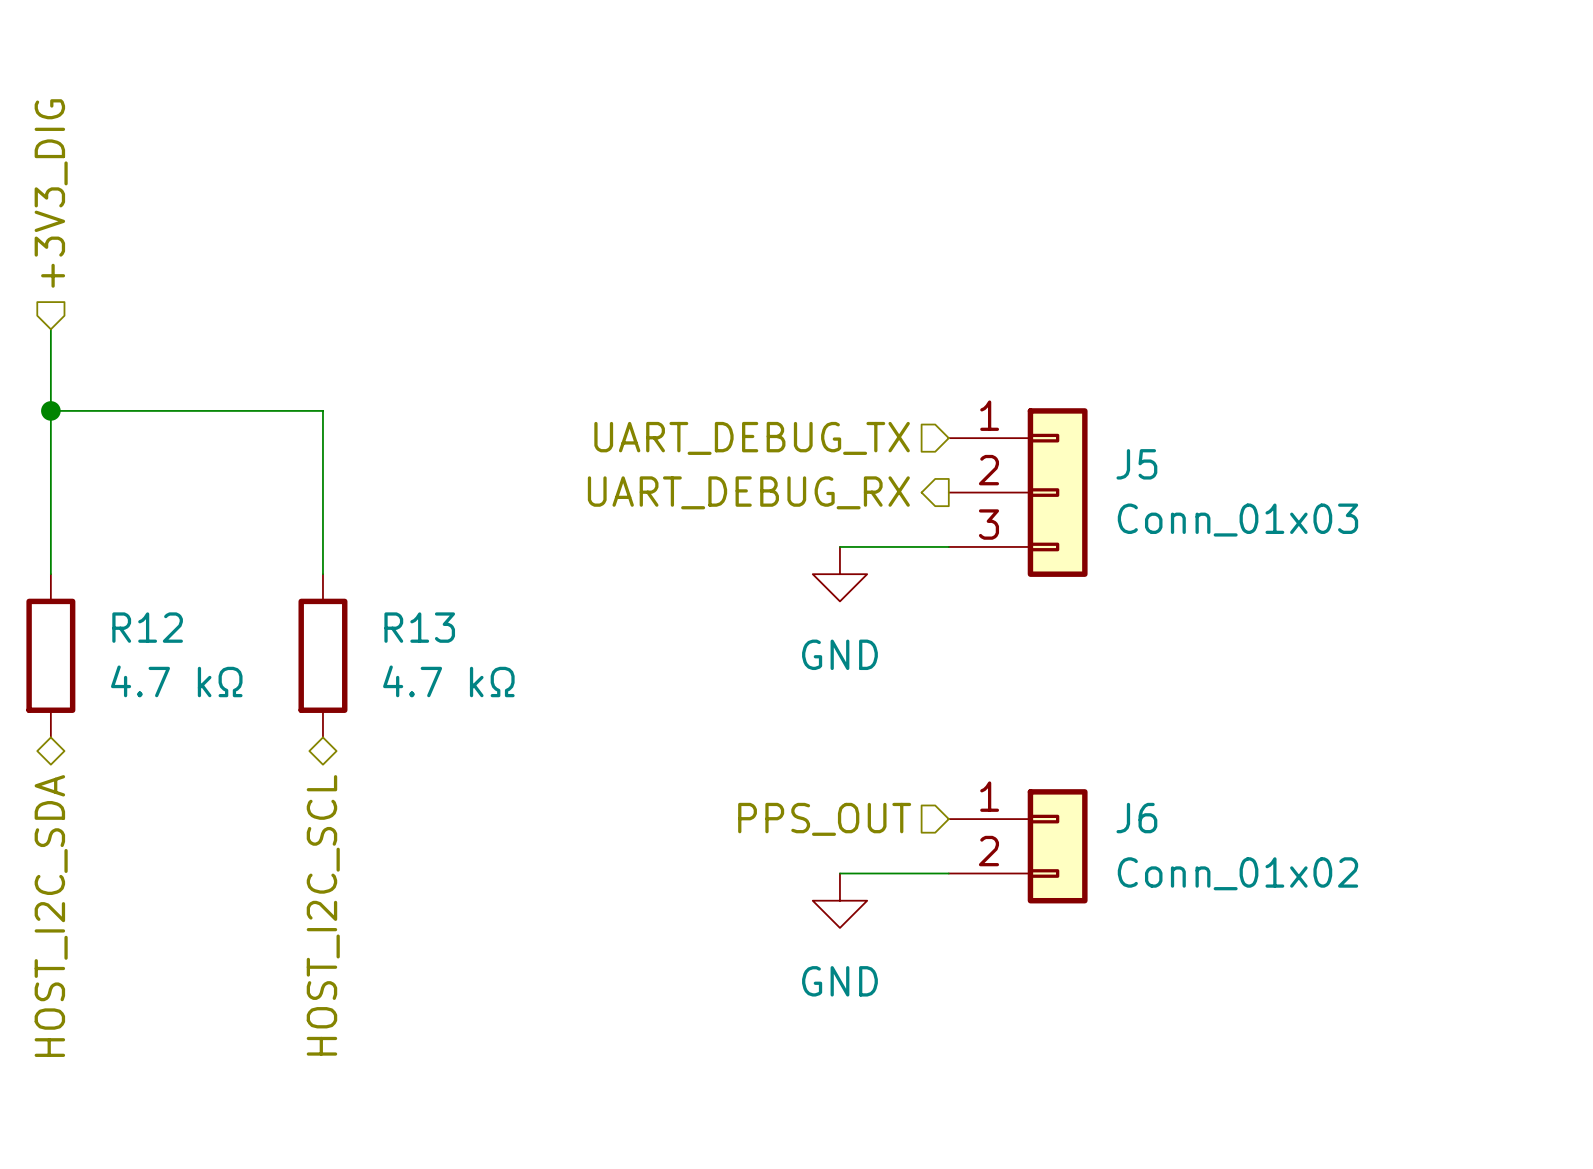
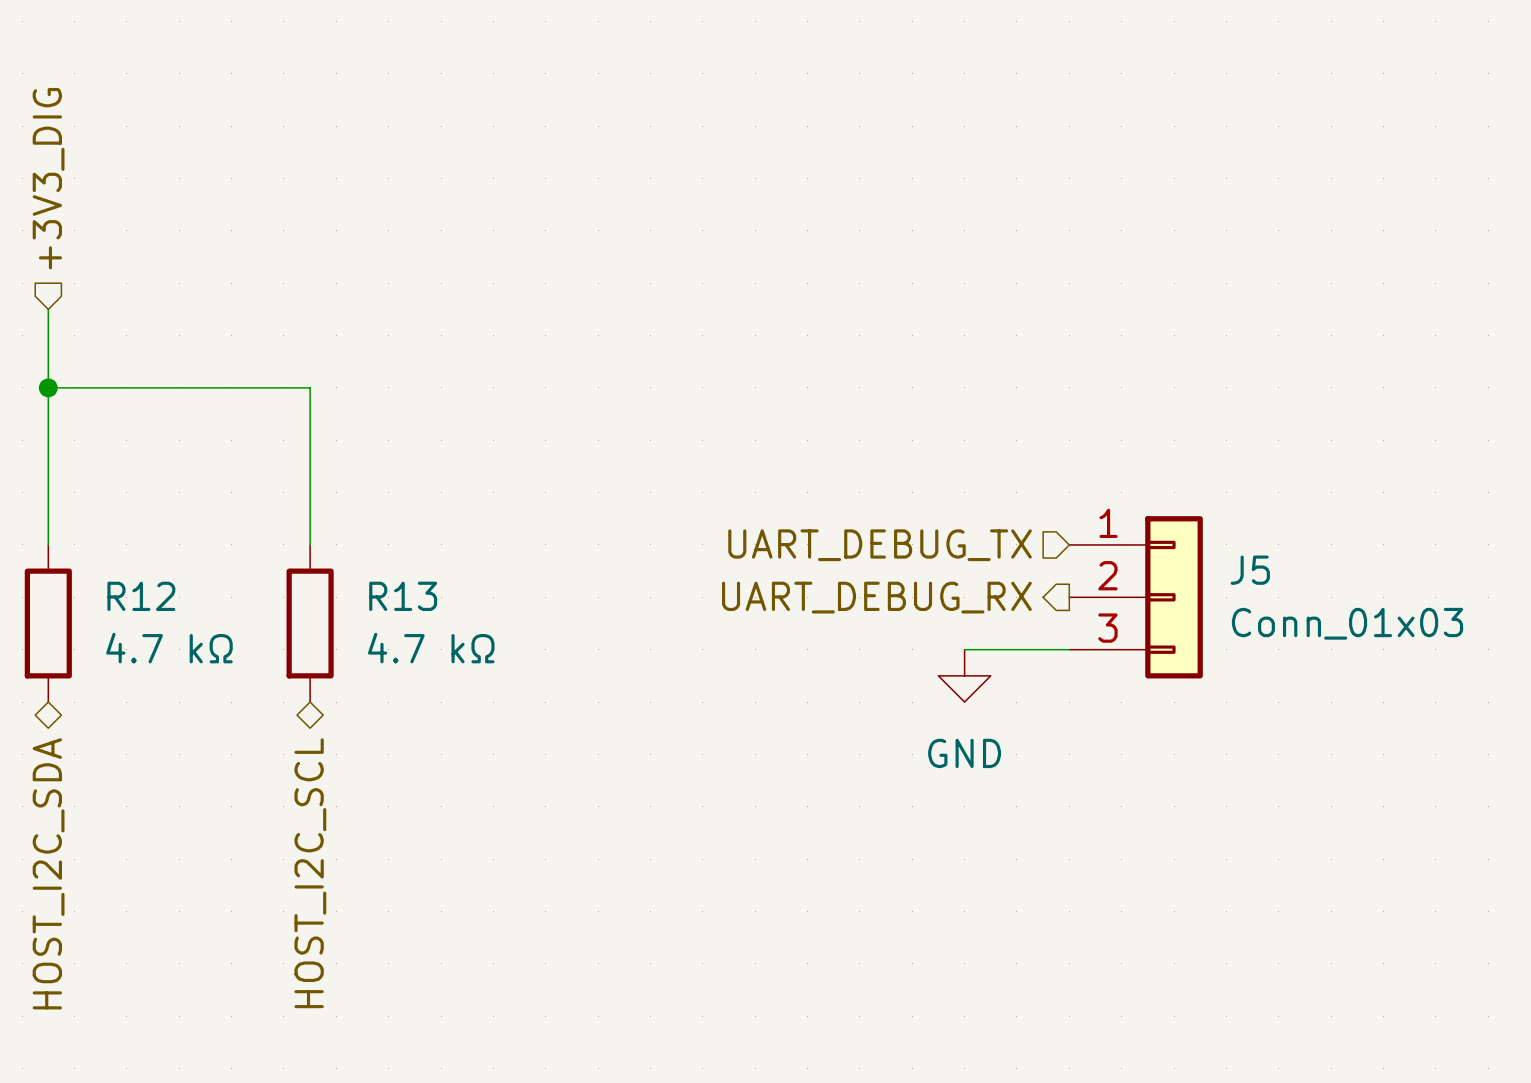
hierarchical label position: UART_DEBUG_TX (752, 438) -> UART_DEBUG_TX (880, 545)
hierarchical label position: UART_DEBUG_RX (748, 492) -> UART_DEBUG_RX (876, 597)
J5 position: (1018, 492) -> (1136, 597)
wire: (839, 546) (948, 546) -> (964, 649) (1069, 649)
power symbol: GND (839, 574) -> none
power symbol: none -> GND (964, 675)
hierarchical label: PPS_OUT (824, 819) -> none
J6: Conn_01x02 (1018, 846) -> none
wire: (839, 873) (948, 873) -> none
power symbol: GND (839, 900) -> none

